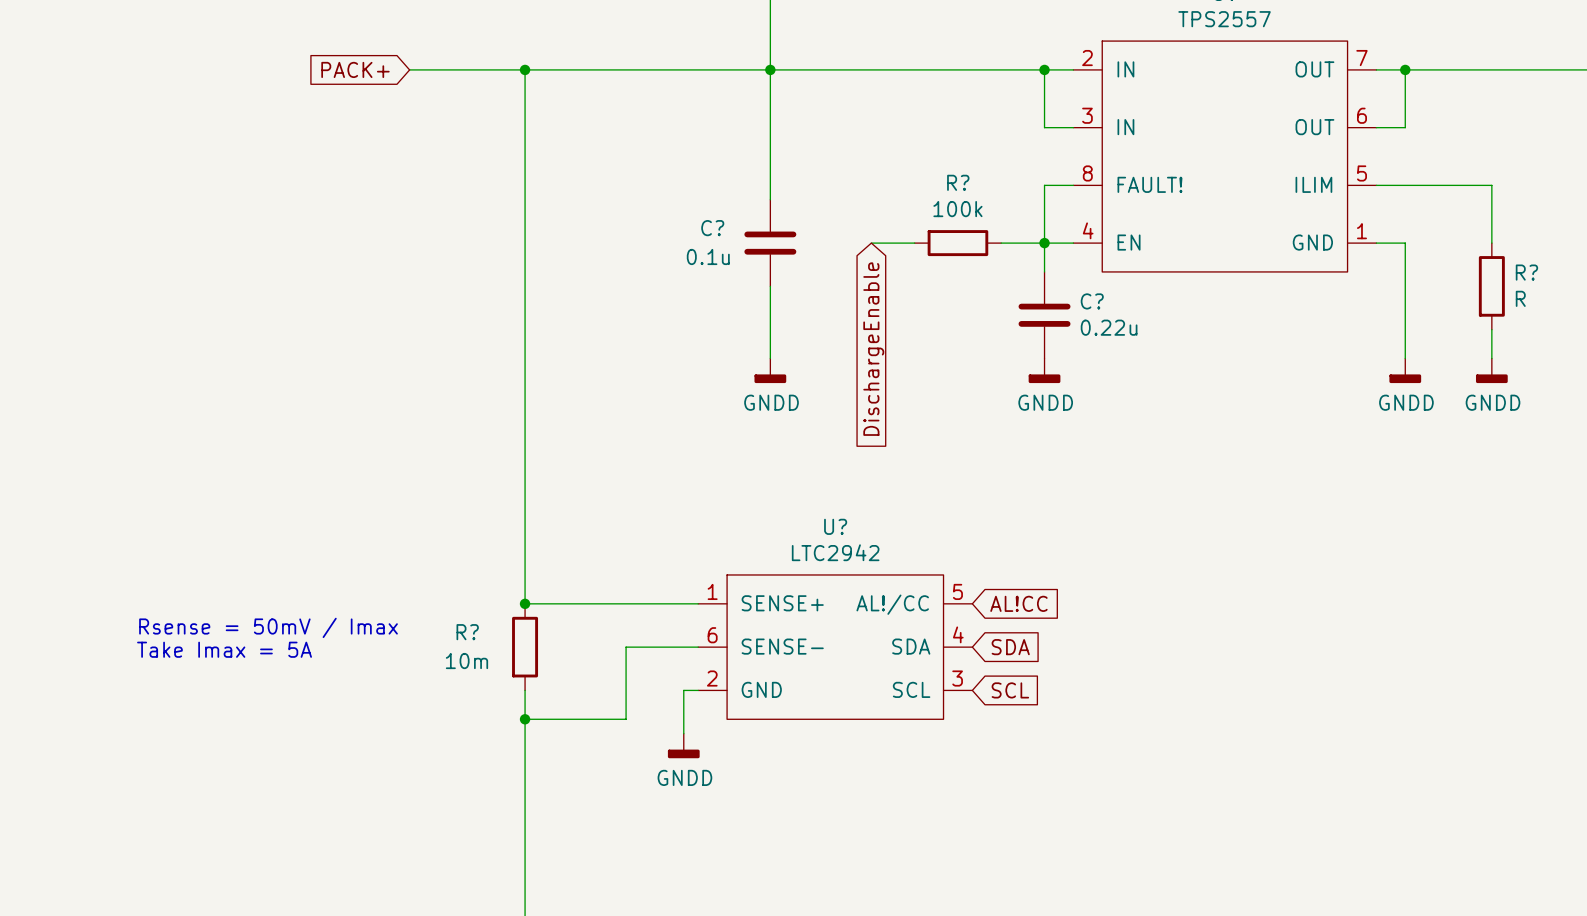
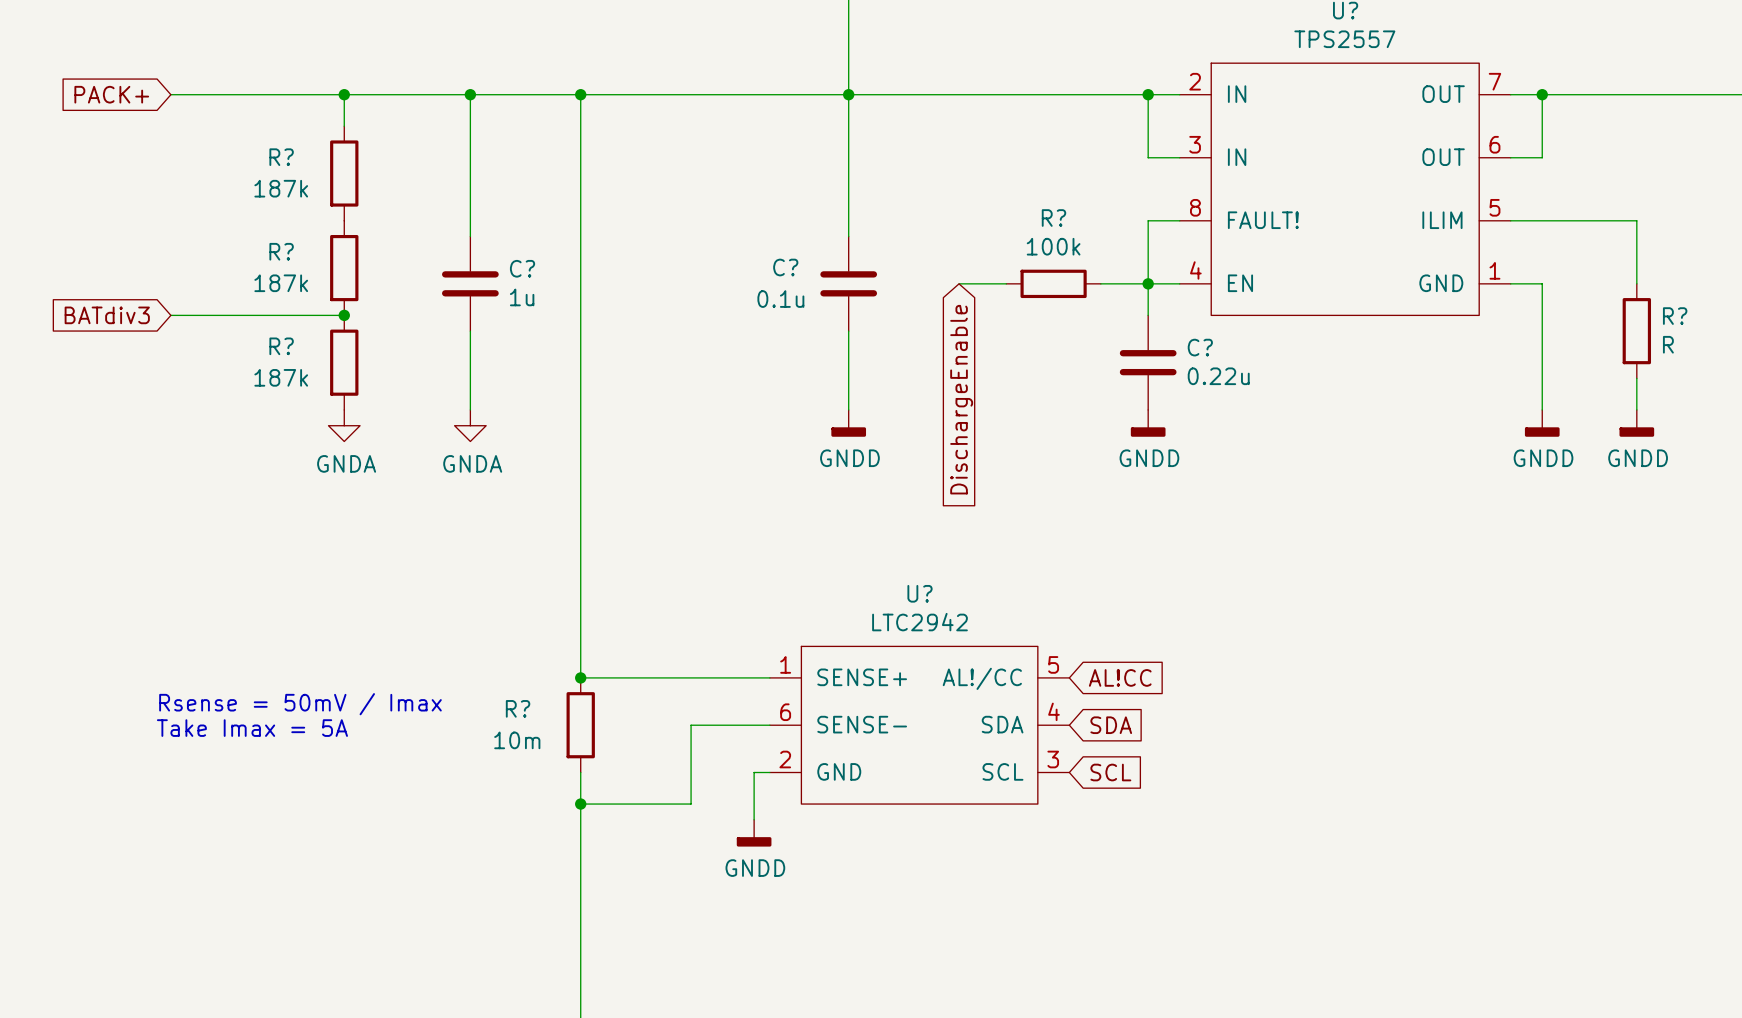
wire: none -> (170, 94) (454, 94)
wire: none -> (344, 94) (344, 126)
junction: none -> (344, 94)
global label position: PACK+ (355, 69) -> PACK+ (111, 94)
wire: none -> (470, 94) (470, 236)
junction: none -> (470, 94)
R?: none -> 187k (344, 173)
R?: none -> 187k (344, 268)
C?: none -> 1u (470, 283)
global label: none -> BATdiv3 (107, 315)
wire: none -> (170, 315) (344, 315)
junction: none -> (344, 315)
wire: none -> (470, 331) (470, 409)
R?: none -> 187k (344, 362)
power symbol: none -> GNDA (344, 425)
power symbol: none -> GNDA (470, 425)

